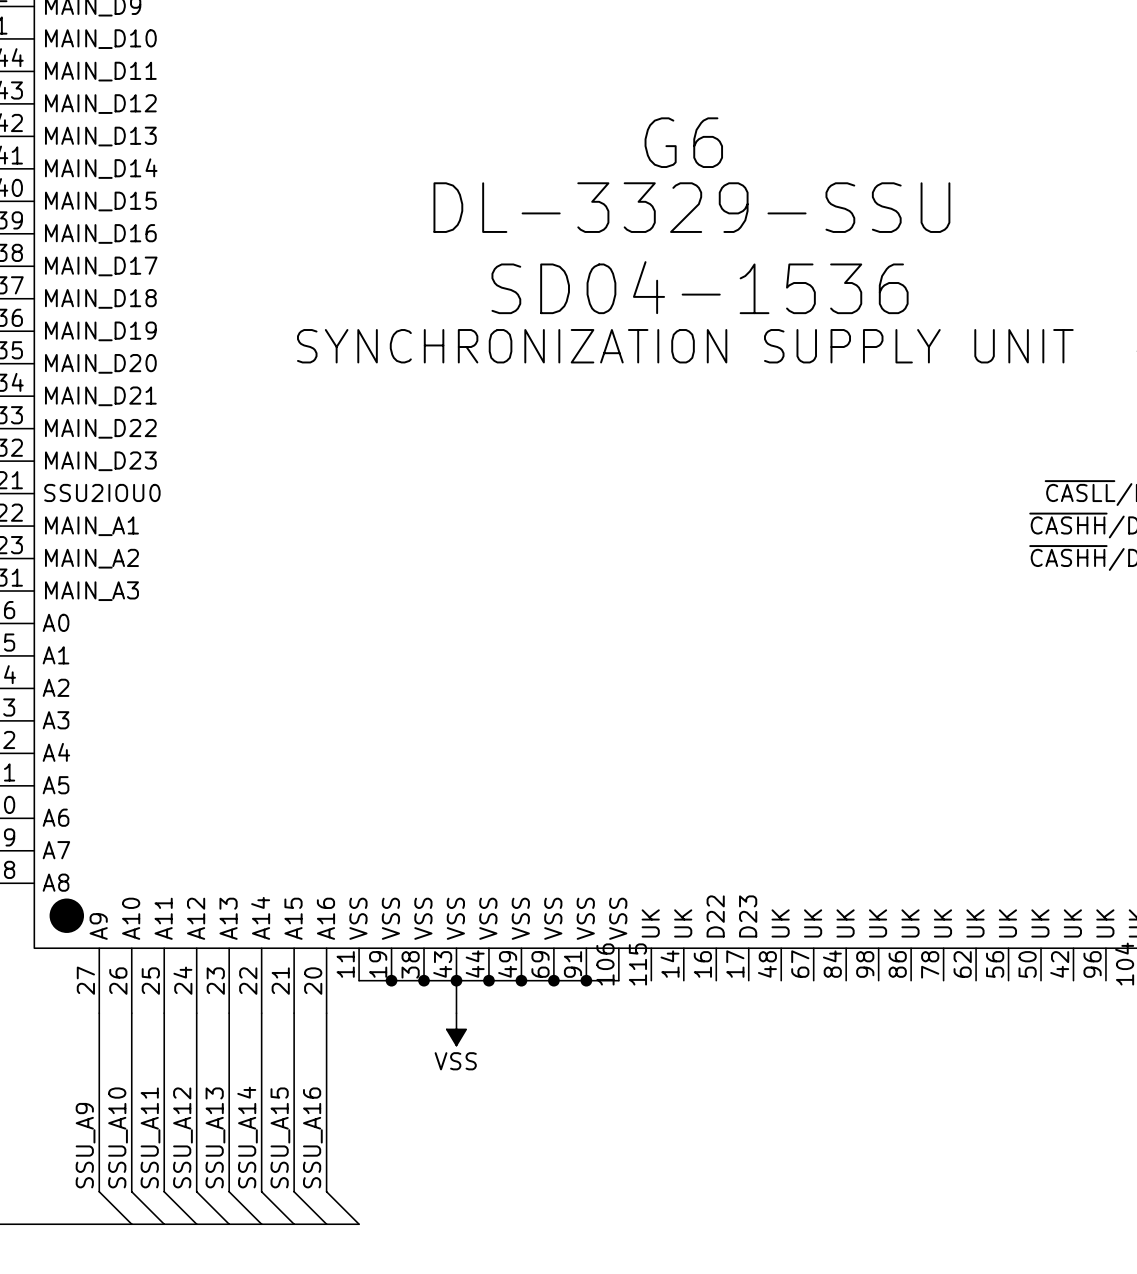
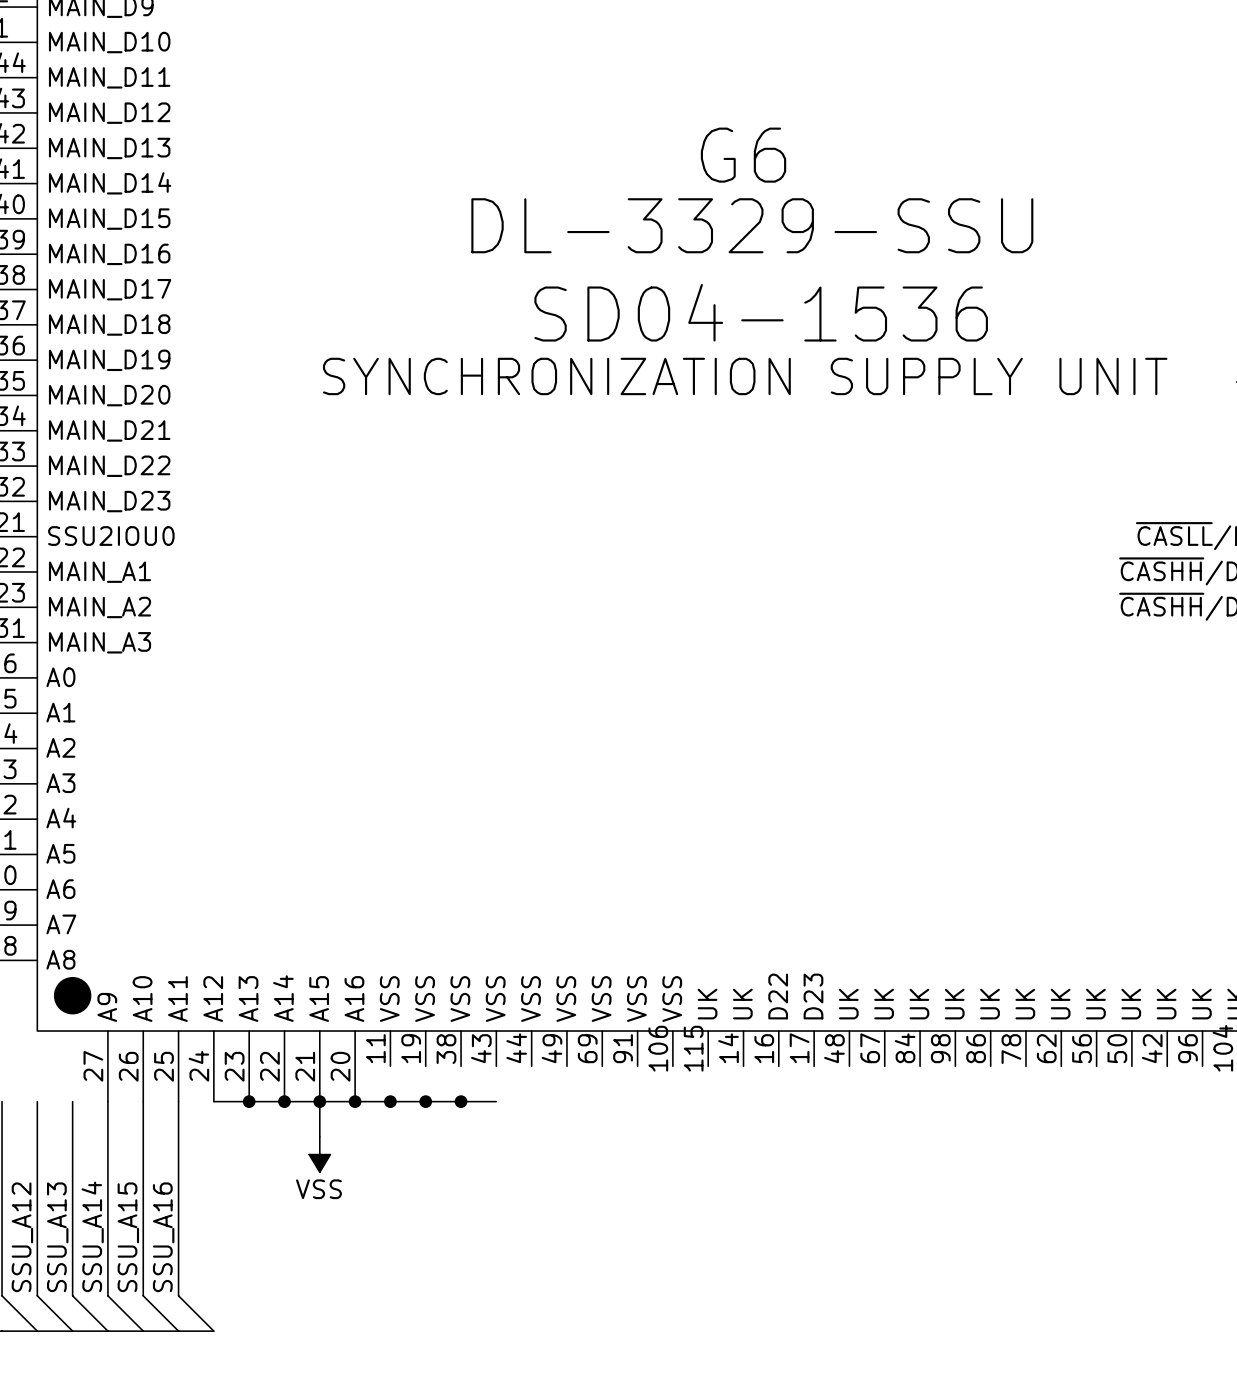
wire: (359, 980) (618, 980) -> none
junction: (391, 980) -> none
junction: (424, 980) -> none
wire: (456, 980) (456, 1013) -> (213, 1101) (496, 1101)
junction: (456, 980) -> none
junction: (488, 980) -> none
junction: (521, 980) -> none
junction: (553, 980) -> none
junction: (586, 980) -> none
wire: (196, 1013) (196, 1191) (229, 1224) -> (37, 1101) (37, 1295) (72, 1331)
wire: (229, 1013) (229, 1191) (261, 1224) -> (72, 1101) (72, 1295) (107, 1331)
junction: none -> (249, 1101)
wire: (261, 1013) (261, 1191) (294, 1224) -> (2, 1101) (2, 1295) (37, 1331)
junction: none -> (284, 1101)
junction: none -> (319, 1101)
wire: (326, 1013) (326, 1191) (359, 1224) -> none
junction: none -> (355, 1101)
junction: none -> (390, 1101)
junction: none -> (425, 1101)
junction: none -> (461, 1101)
power symbol position: VSS (456, 1029) -> VSS (319, 1154)
wire: (294, 1045) (294, 1191) (326, 1224) -> none
label: SSU_A10 (118, 1137) -> SSU_A15 (128, 1237)
label: SSU_A11 (150, 1137) -> SSU_A16 (163, 1237)
label position: SSU_A12 (182, 1137) -> SSU_A12 (22, 1237)
label position: SSU_A13 (215, 1137) -> SSU_A13 (57, 1237)
label: SSU_A14 (247, 1137) -> none
label: SSU_A15 (280, 1137) -> none
label: SSU_A16 (312, 1137) -> none
label: SSU_A9 (85, 1145) -> SSU_A14 (92, 1236)
bus: (196, 1224) (359, 1224) -> none

